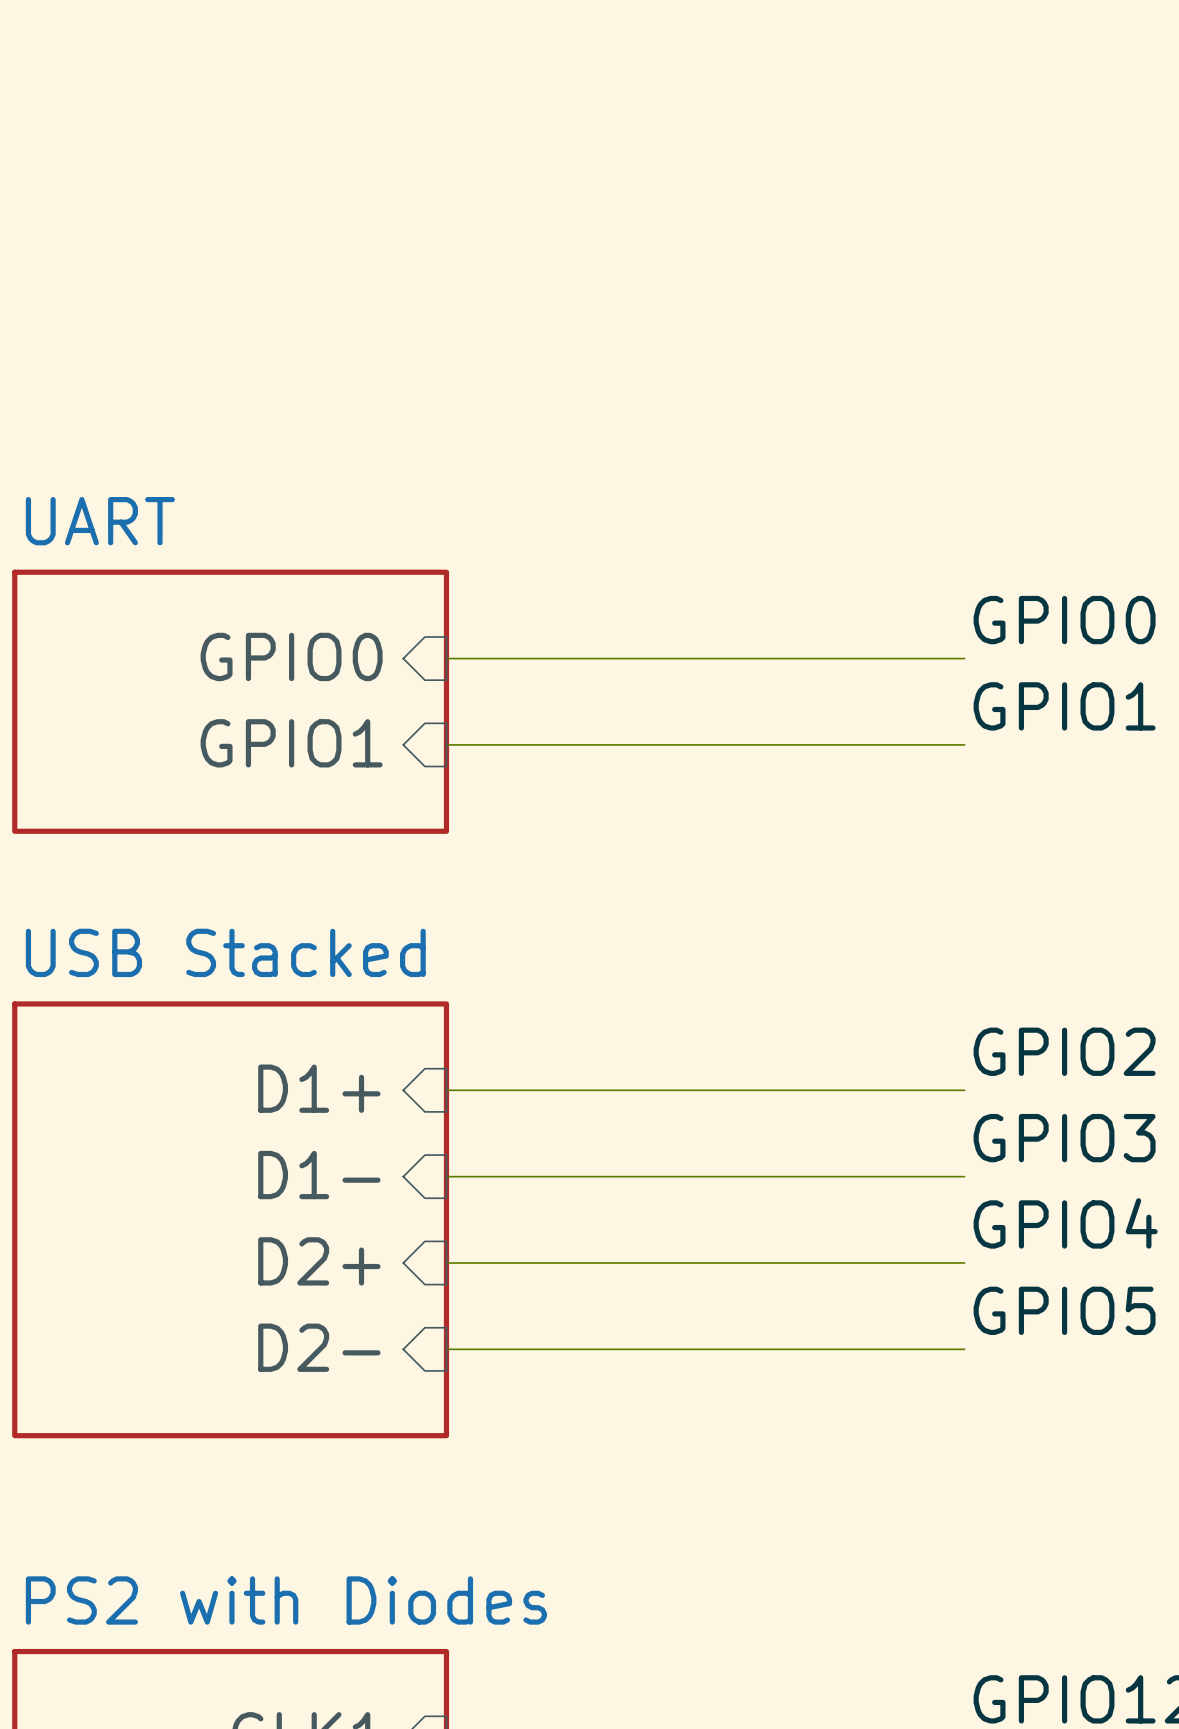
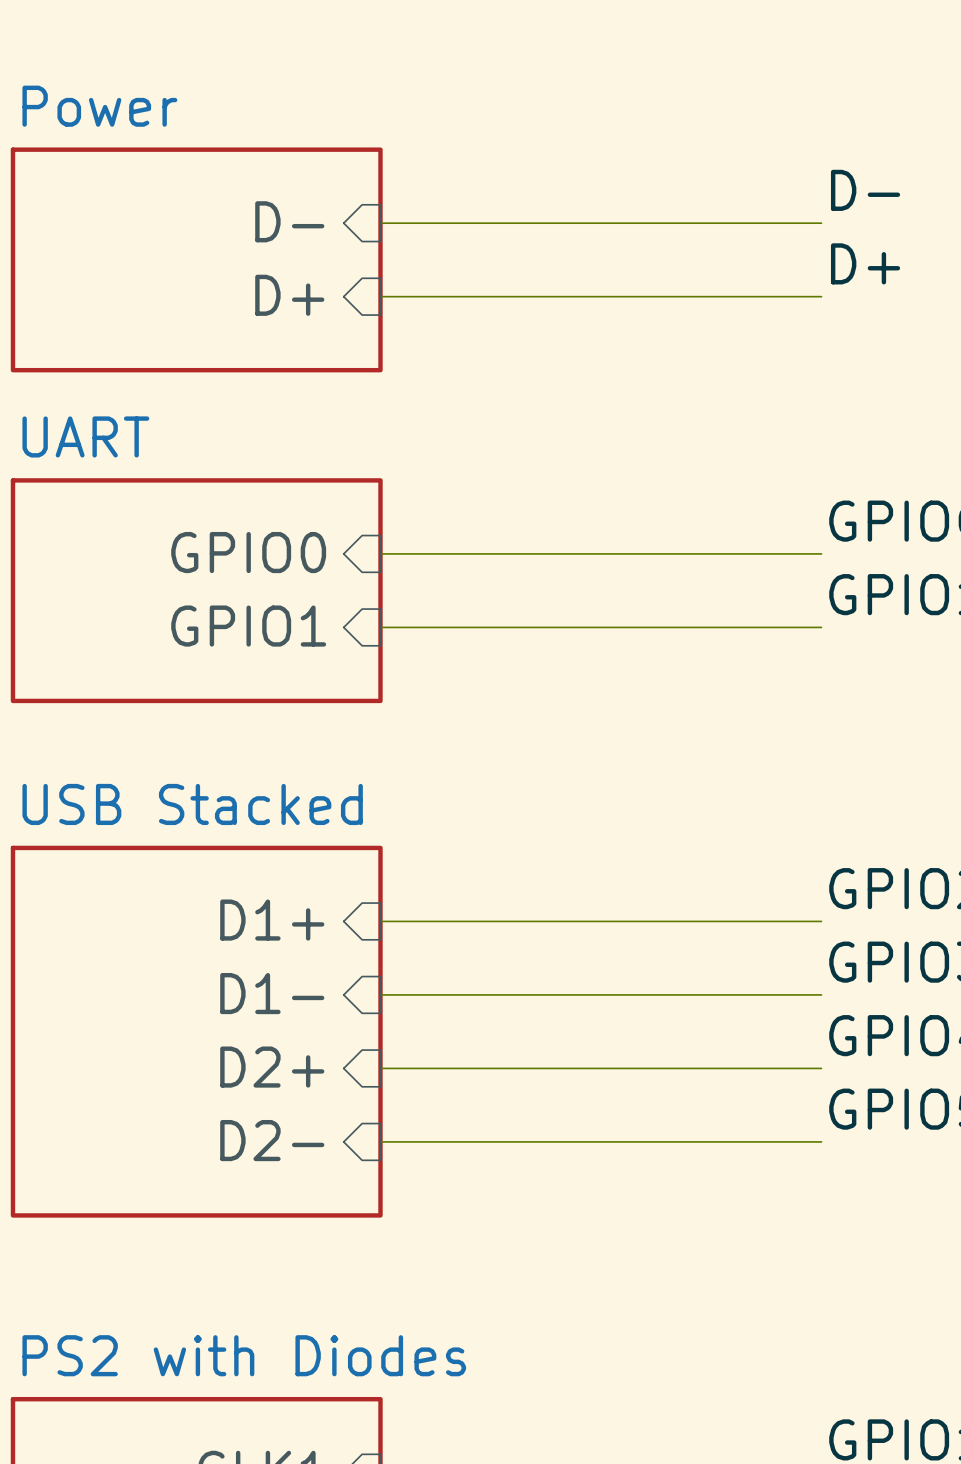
label: none -> D- (865, 190)
sheet pin: none -> D- (289, 221)
wire: none -> (380, 223) (821, 223)
sheet Power: none -> (196, 259)
label: none -> D+ (865, 263)
sheet pin: none -> D+ (289, 295)
wire: none -> (380, 296) (821, 296)

